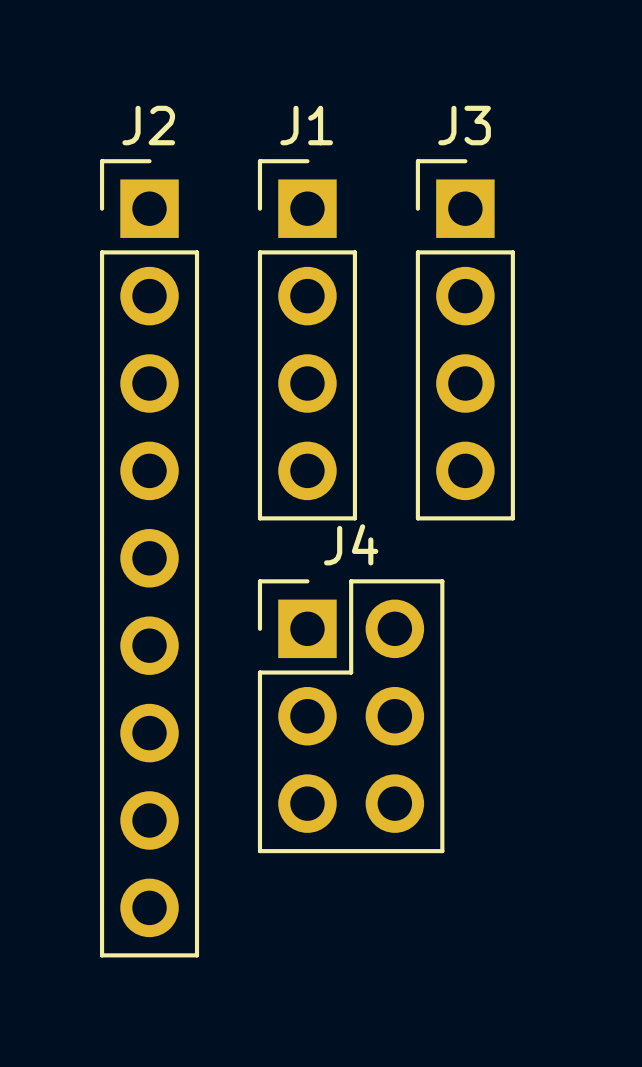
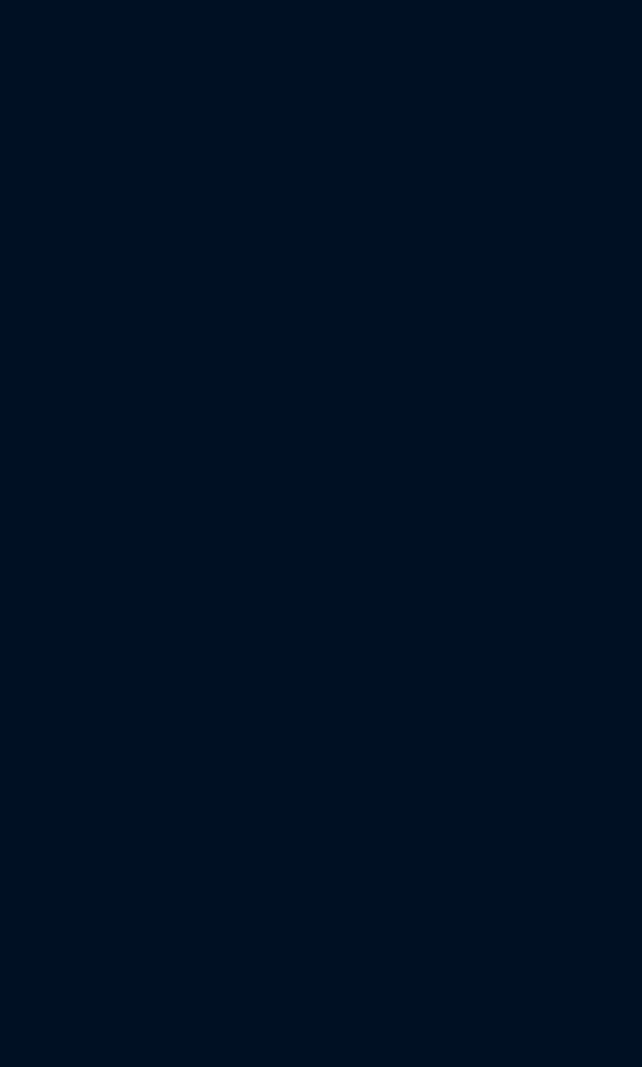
J1: (307, 339) -> none
J3: (465, 339) -> none
J2: (149, 558) -> none
J4: (351, 716) -> none

